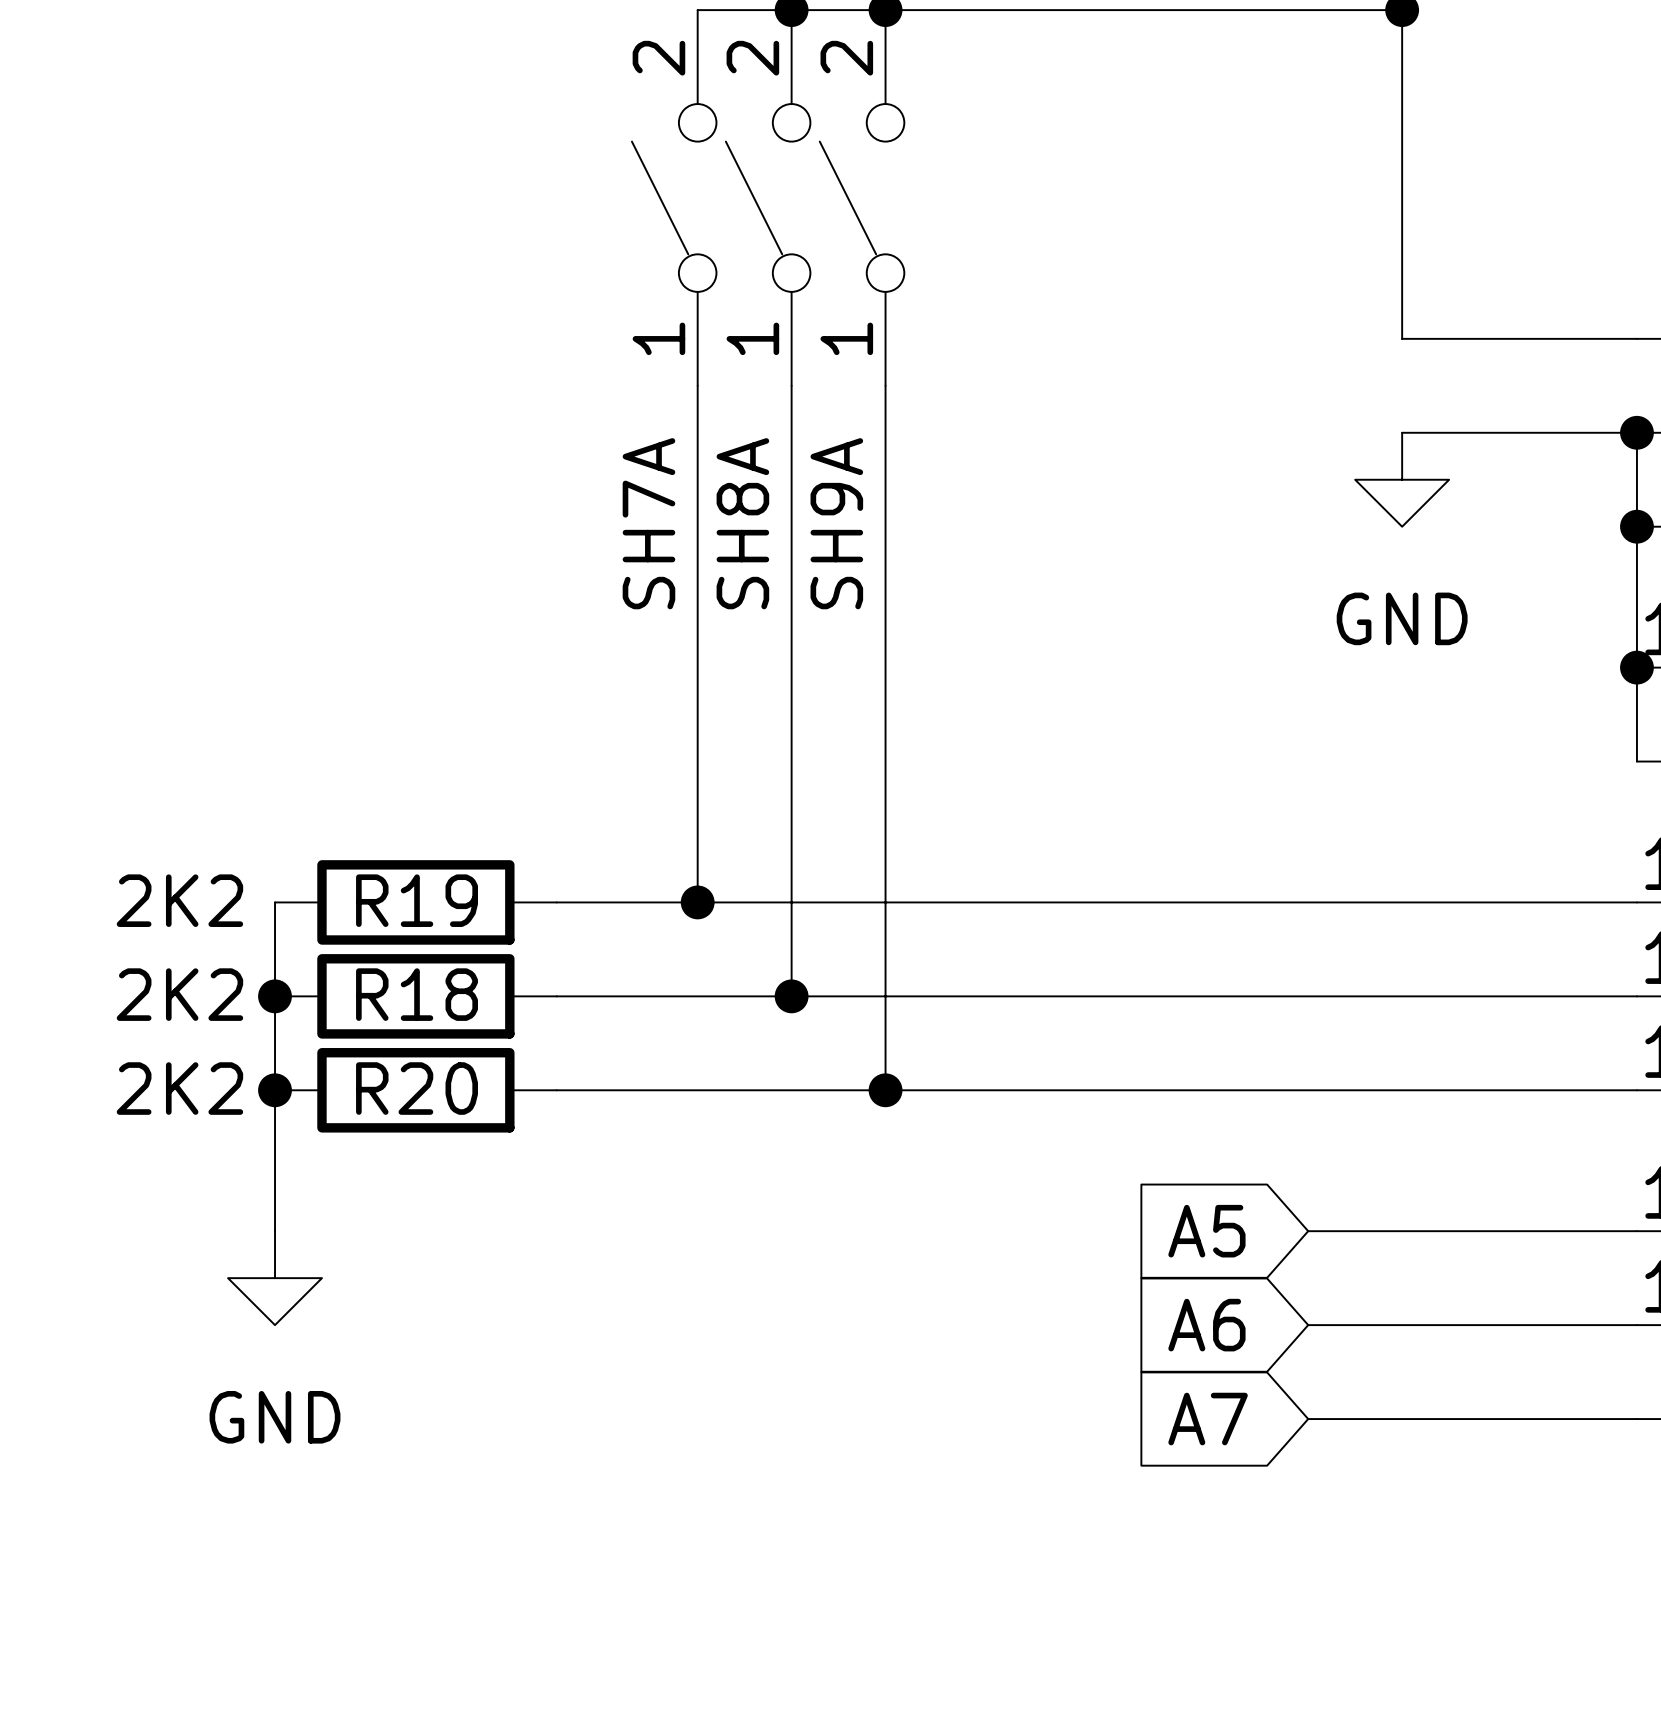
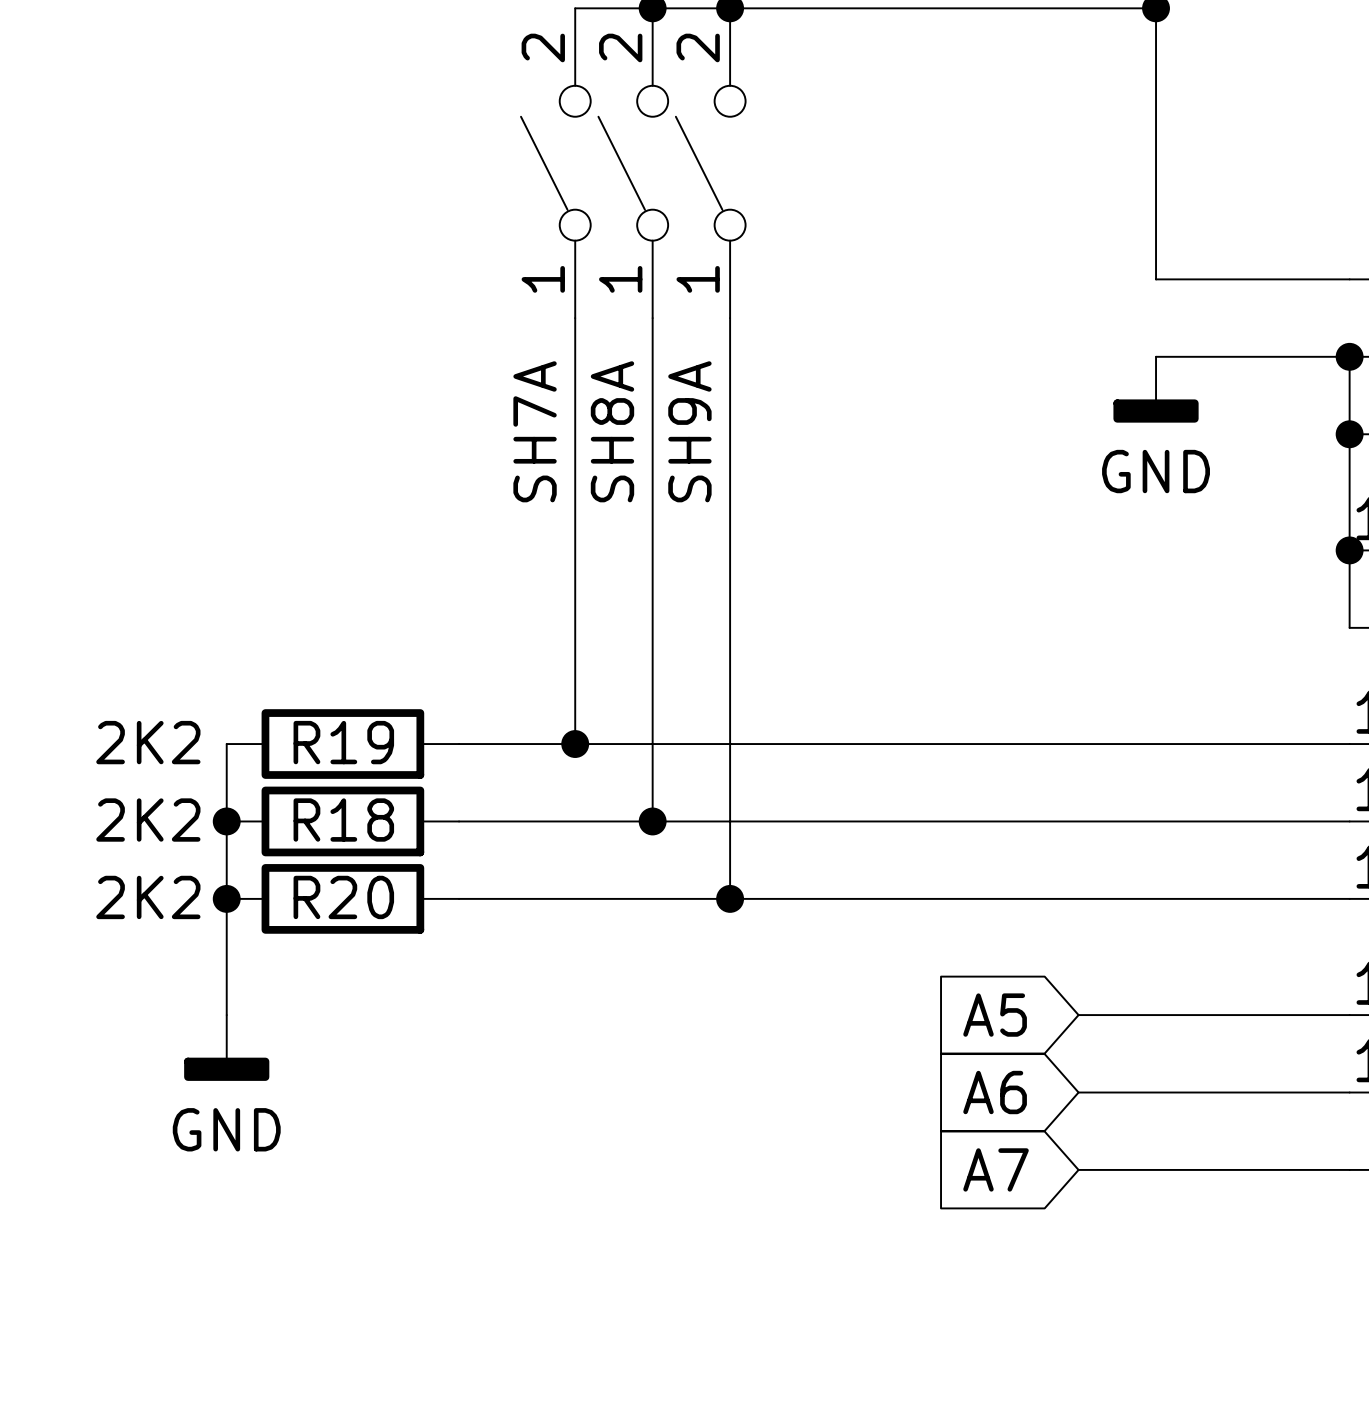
power symbol shape: [1355, 432, 1450, 527] -> [1113, 356, 1199, 423]
power symbol text position: GND (1402, 618) -> GND (1156, 471)
power symbol shape: [228, 1231, 322, 1326] -> [184, 1015, 270, 1081]
power symbol text position: GND (275, 1417) -> GND (226, 1129)

